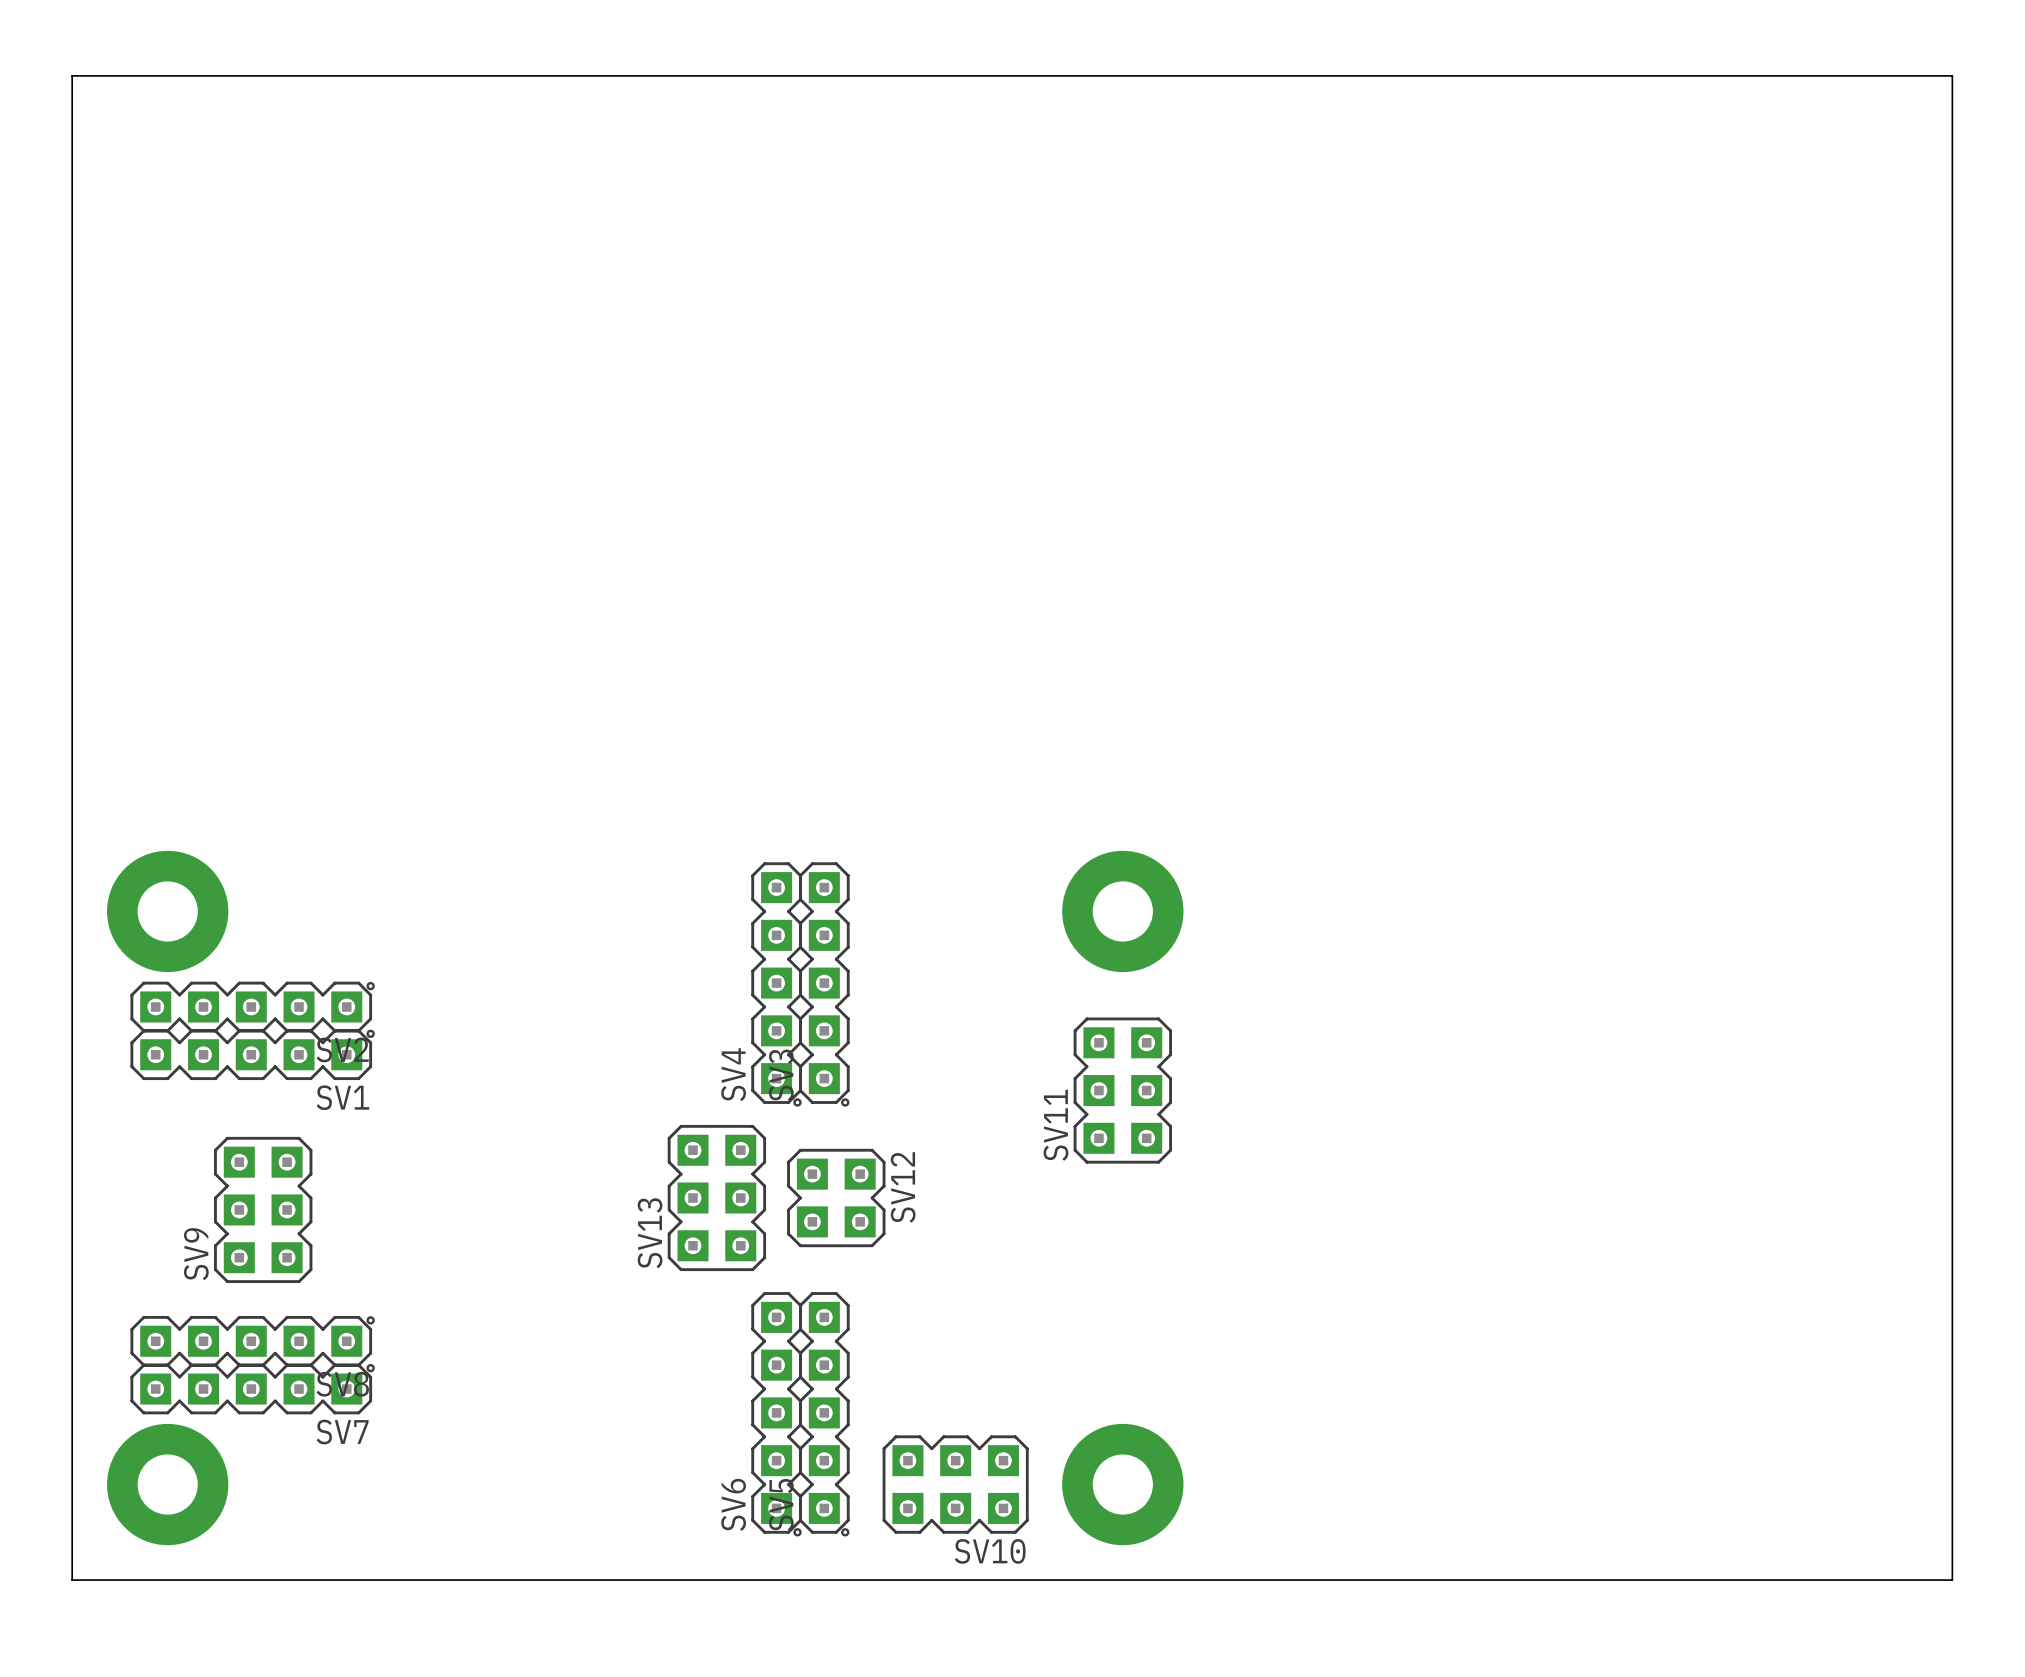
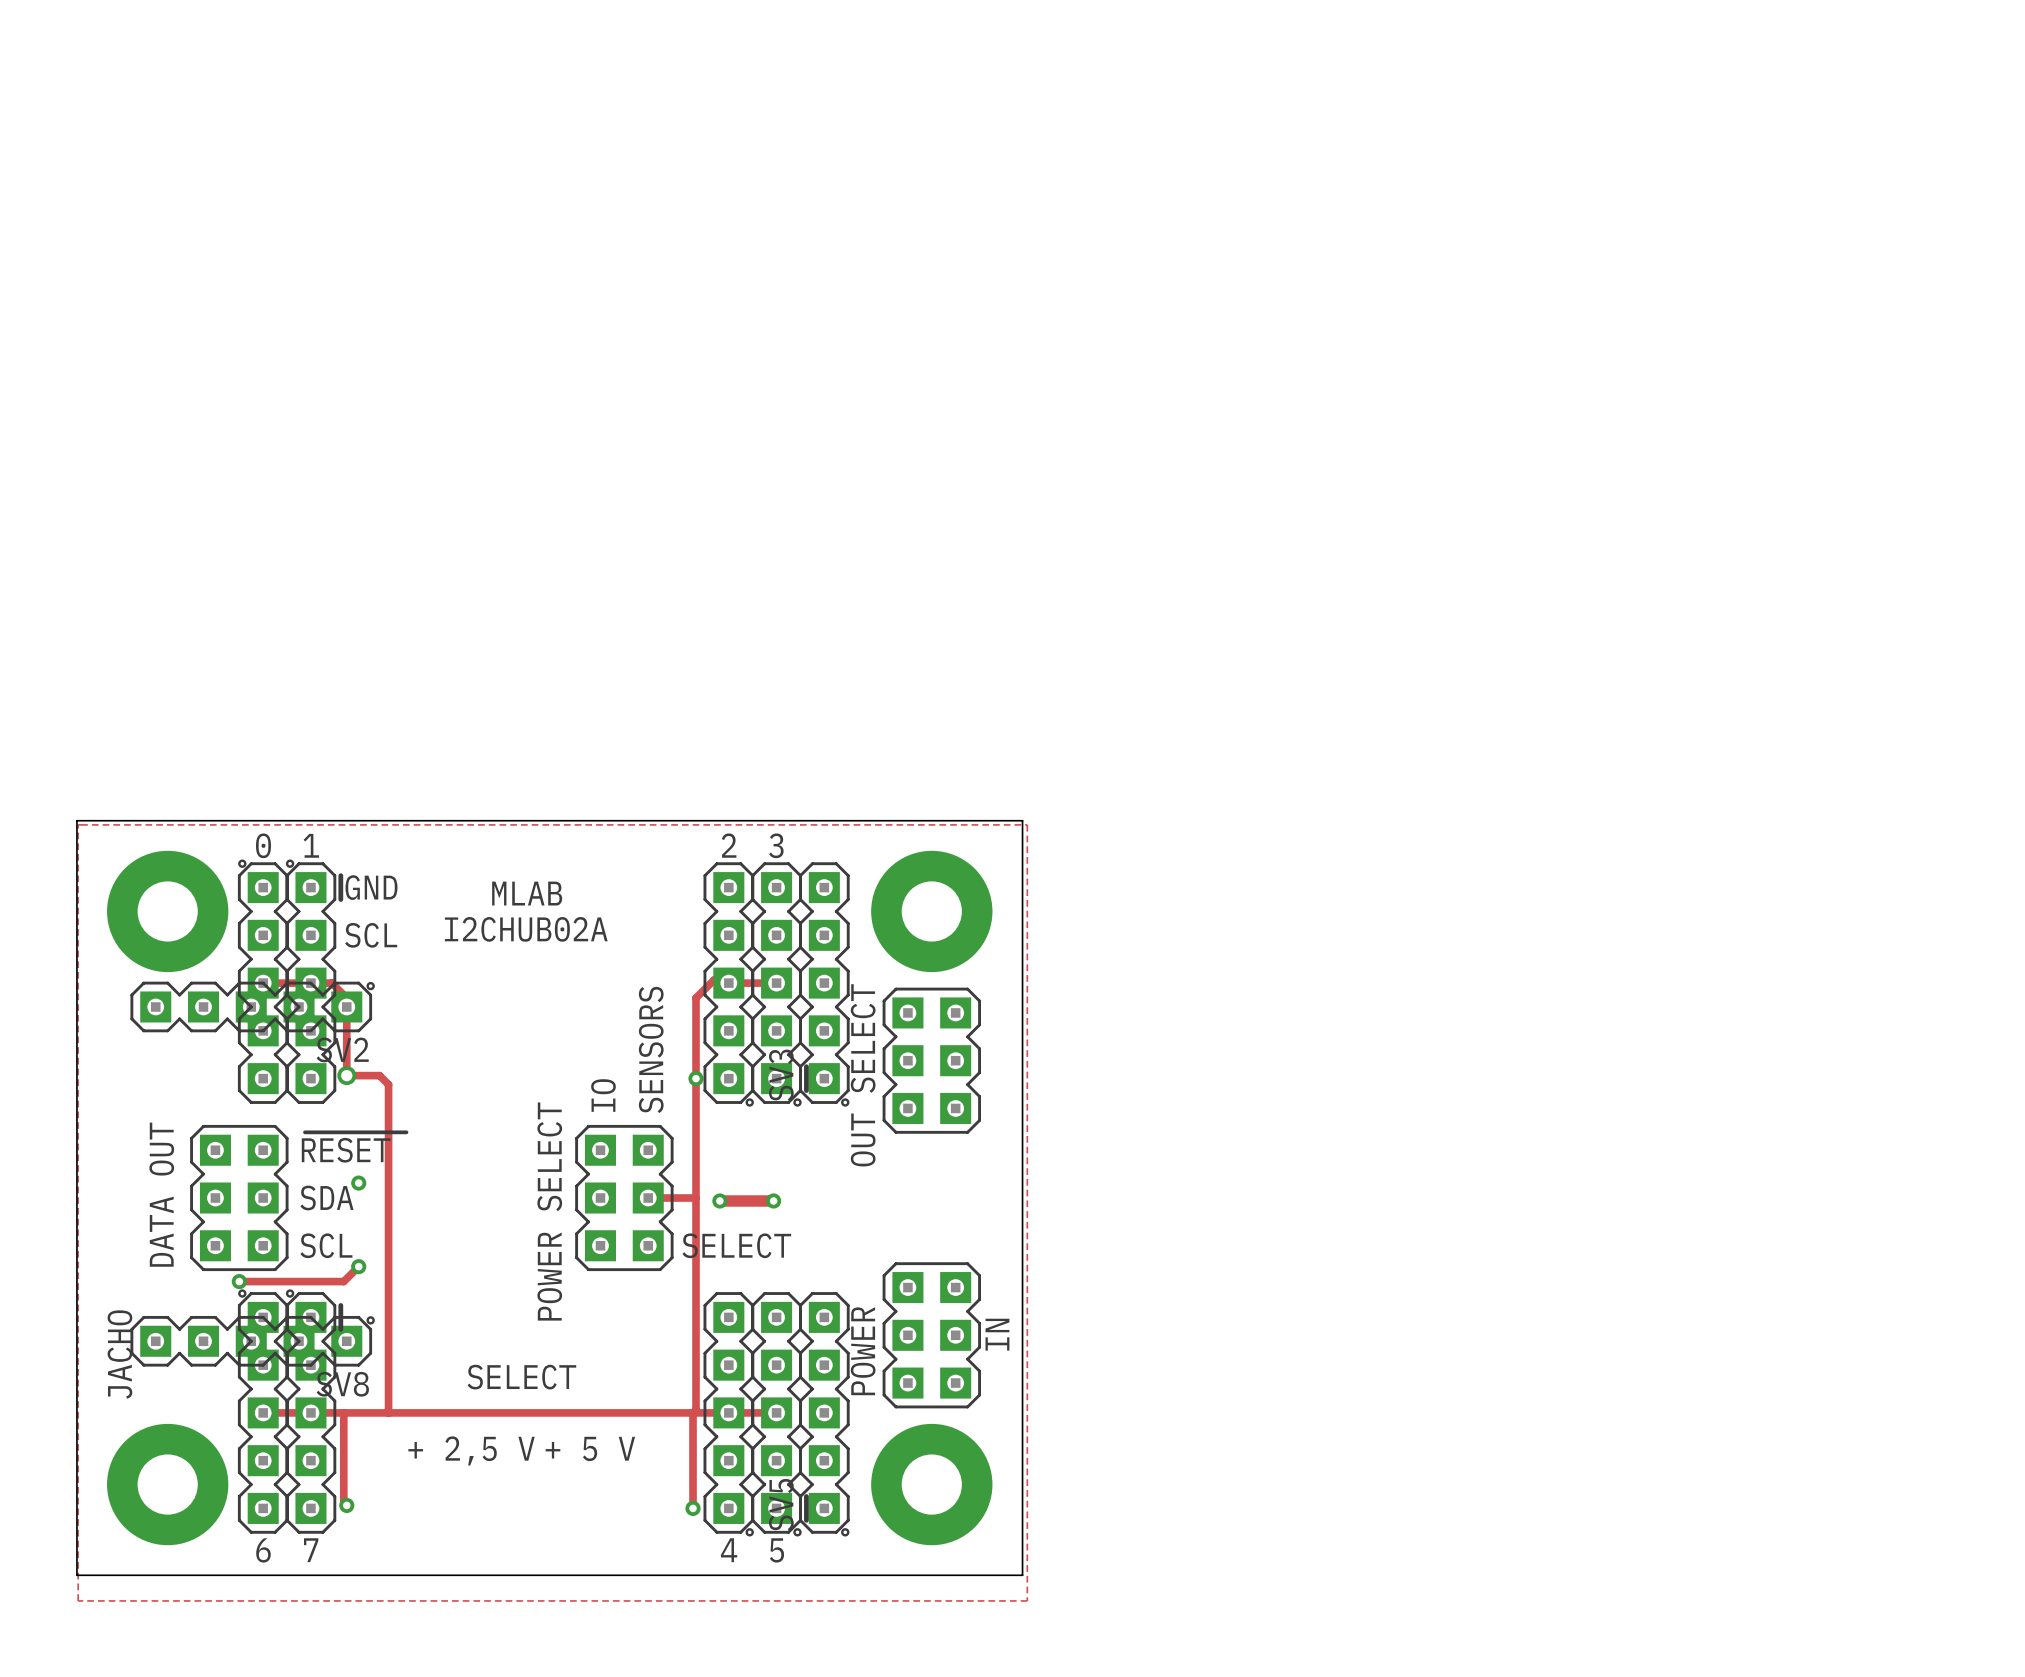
board edge: (72, 75) (1952, 75) (1952, 1580) (72, 1580) (72, 75) -> none
board edge: none -> (76, 820) (1022, 820) (1022, 1575) (76, 1575) (76, 820)
zone outline: none -> (78, 824) (1027, 824) (1027, 1600) (78, 1600) (78, 824)
text: none -> 0 (263, 845)
text: none -> 1 (311, 845)
text: none -> 2 (729, 845)
text: none -> 3 (776, 845)
line: none -> (340, 875) (340, 899)
text: none -> GND (371, 887)
text: none -> MLAB (527, 893)
part position: (1122, 911) -> (931, 911)
text: none -> I2CHUB02A (526, 929)
text: none -> SCL (371, 935)
part: none -> (263, 981)
part: none -> (310, 981)
track: none -> (263, 983) (331, 983) (346, 998) (346, 1075) (379, 1075) (388, 1084) (388, 1412)
track: none -> (776, 983) (728, 983) (725, 980) (713, 980) (696, 998) (696, 1409) (693, 1412) (693, 1508)
part: none -> (728, 984)
text: none -> SENSORS (651, 1049)
SV1: (252, 1054) -> none
part: none -> (931, 1060)
line: none -> (806, 1066) (806, 1090)
SV4 name: SV4 (733, 1074) -> none
via: none -> (346, 1075)
text: none -> OUT SELECT (863, 1075)
via: none -> (696, 1078)
SV11: (1122, 1090) -> none
text: none -> IO (603, 1095)
line: none -> (304, 1132) (406, 1132)
text: none -> RESET (346, 1150)
via: none -> (358, 1183)
text: none -> DATA OUT (161, 1194)
part: none -> (239, 1198)
text: none -> SDA (326, 1198)
part: none -> (624, 1198)
track: none -> (648, 1198) (696, 1198)
SV13: (716, 1198) -> none
SV12: (836, 1198) -> none
track: none -> (719, 1200) (773, 1200)
via: none -> (719, 1200)
via: none -> (773, 1200)
SV9: (263, 1209) -> none
text: none -> POWER SELECT (549, 1211)
text: none -> SCL (326, 1245)
text: none -> SELECT (736, 1245)
track: none -> (358, 1266) (343, 1281) (239, 1281)
via: none -> (358, 1266)
via: none -> (239, 1281)
line: none -> (340, 1305) (340, 1329)
text: none -> IN (997, 1334)
part: none -> (931, 1335)
text: none -> POWER (863, 1351)
text: none -> JACHO (119, 1354)
text: none -> SELECT (521, 1377)
SV7: (252, 1389) -> none
part: none -> (263, 1411)
part: none -> (310, 1411)
track: none -> (263, 1412) (779, 1412)
track: none -> (343, 1412) (343, 1502) (346, 1505)
part: none -> (728, 1414)
text: none -> + 5 V (590, 1448)
text: none -> + 2,5 V (471, 1450)
SV10: (955, 1484) -> none
part position: (1122, 1484) -> (931, 1484)
line: none -> (806, 1496) (806, 1520)
SV6 name: SV6 (733, 1504) -> none
via: none -> (346, 1505)
via: none -> (693, 1508)
text: none -> 6 (263, 1550)
text: none -> 7 (311, 1550)
text: none -> 4 (729, 1550)
text: none -> 5 (776, 1550)

